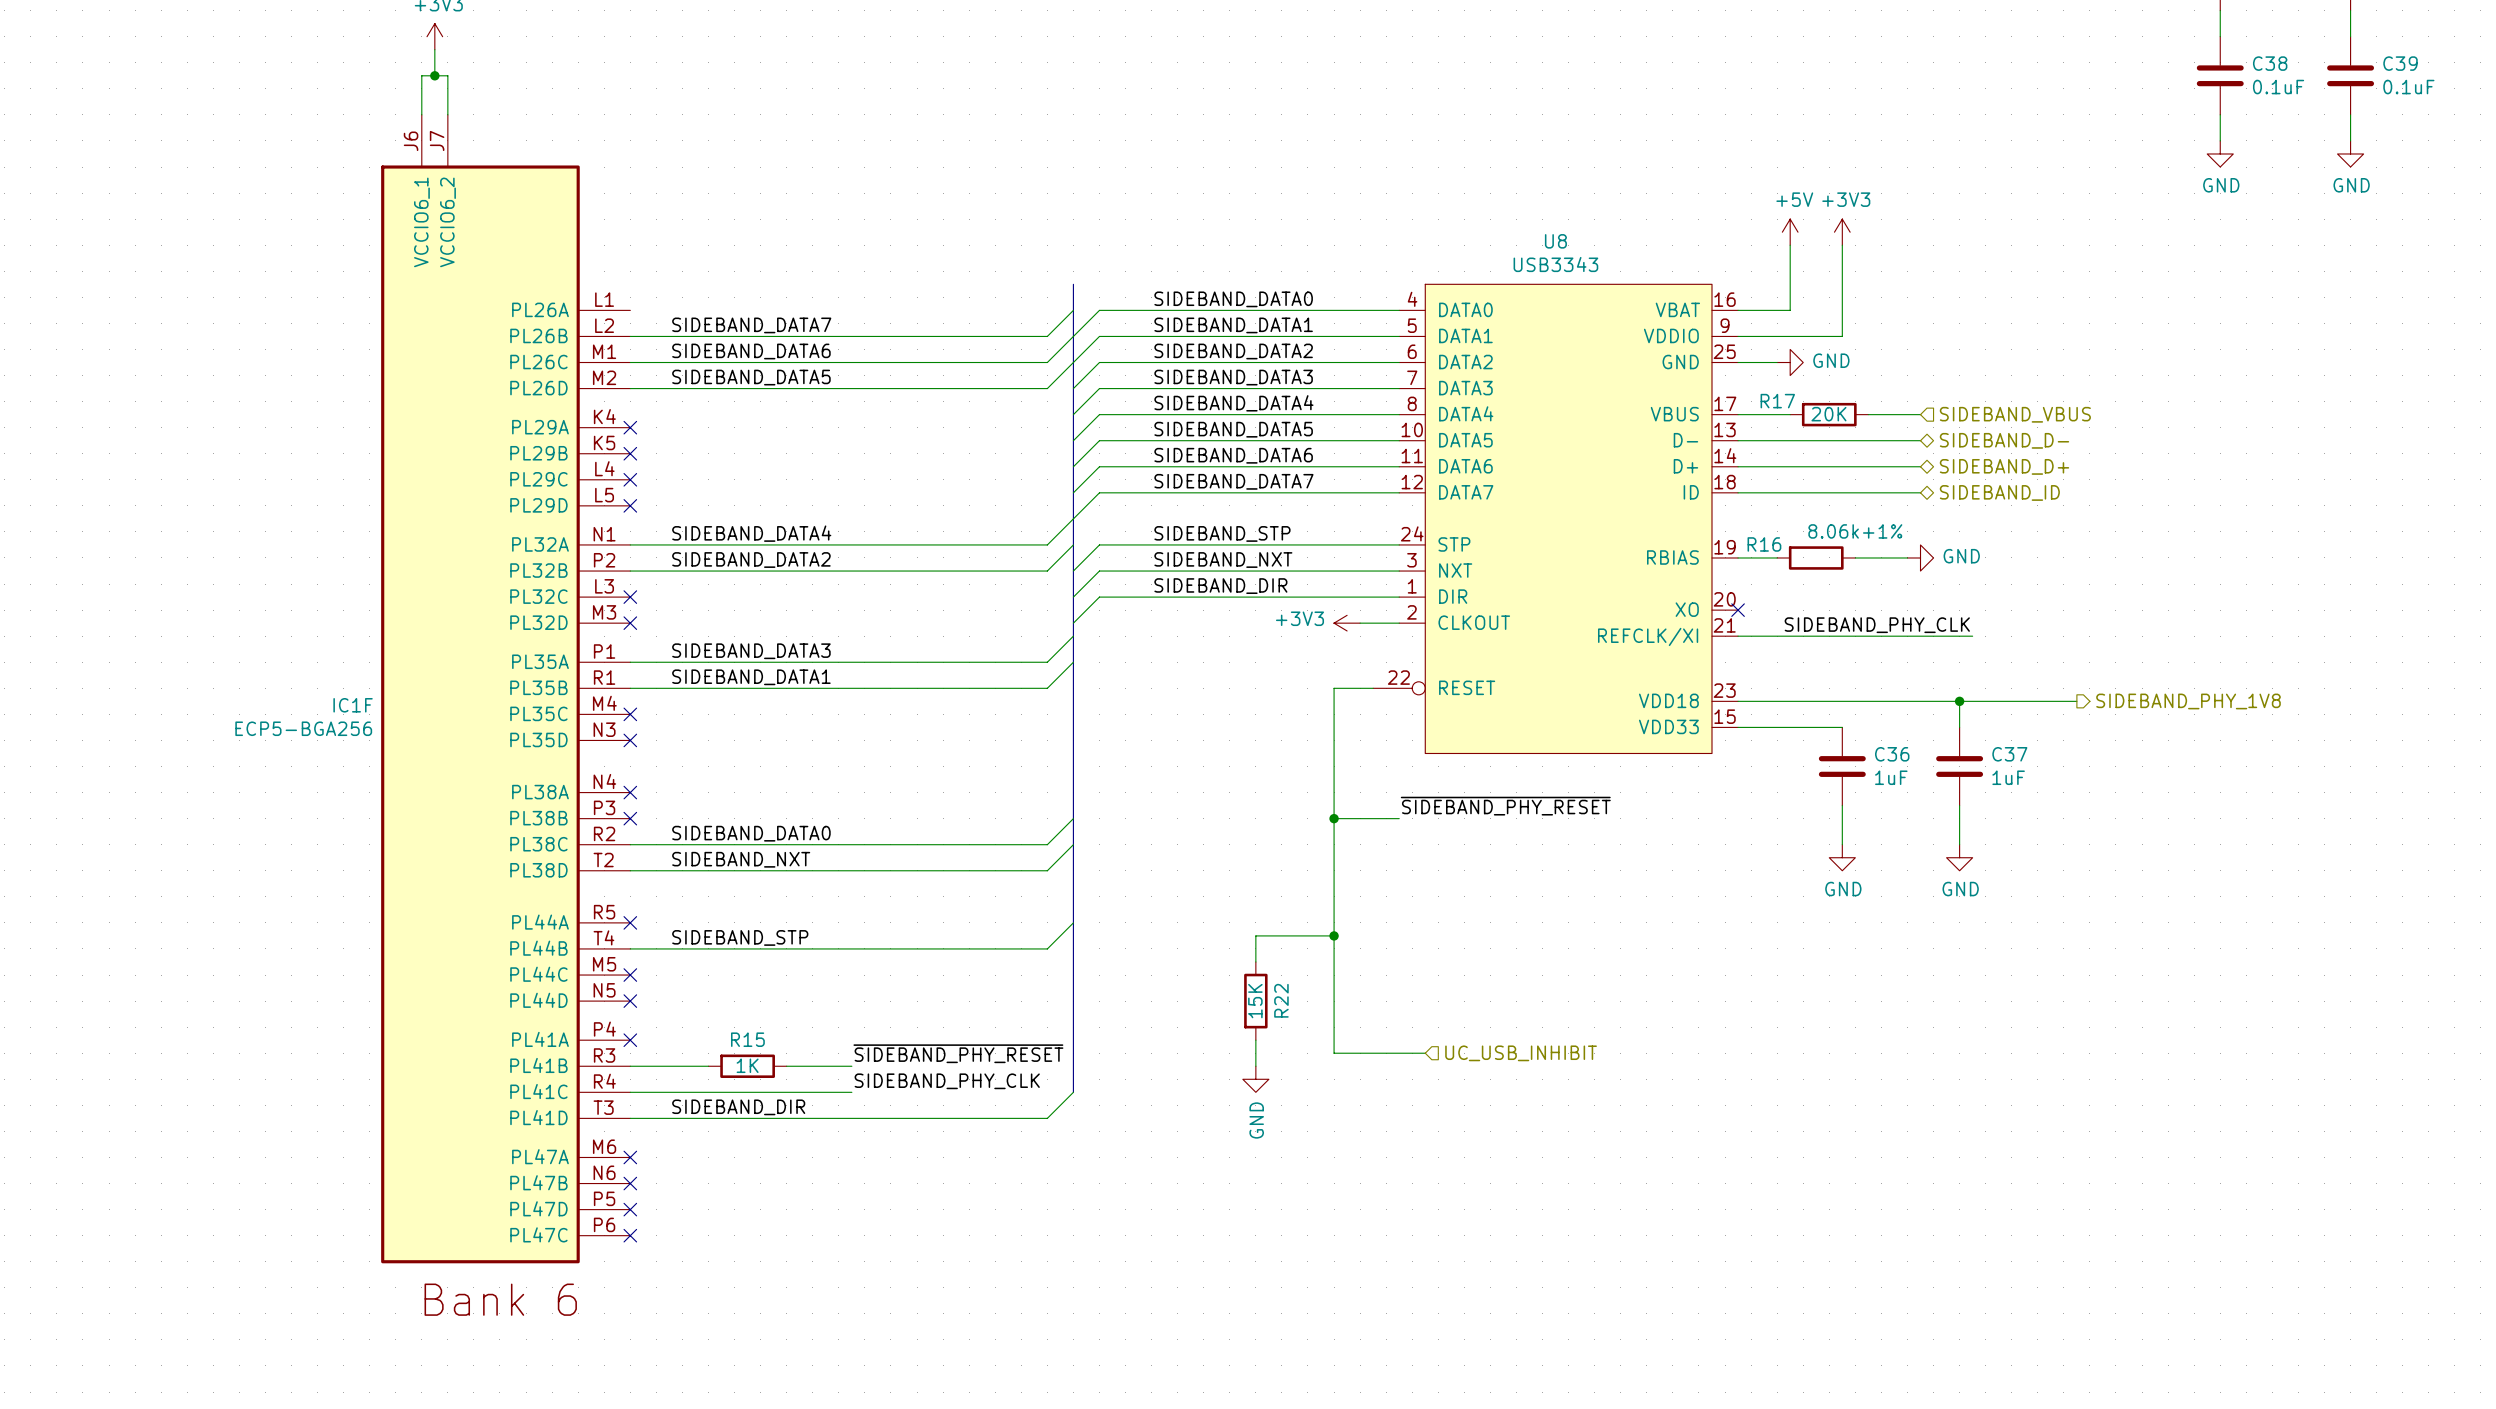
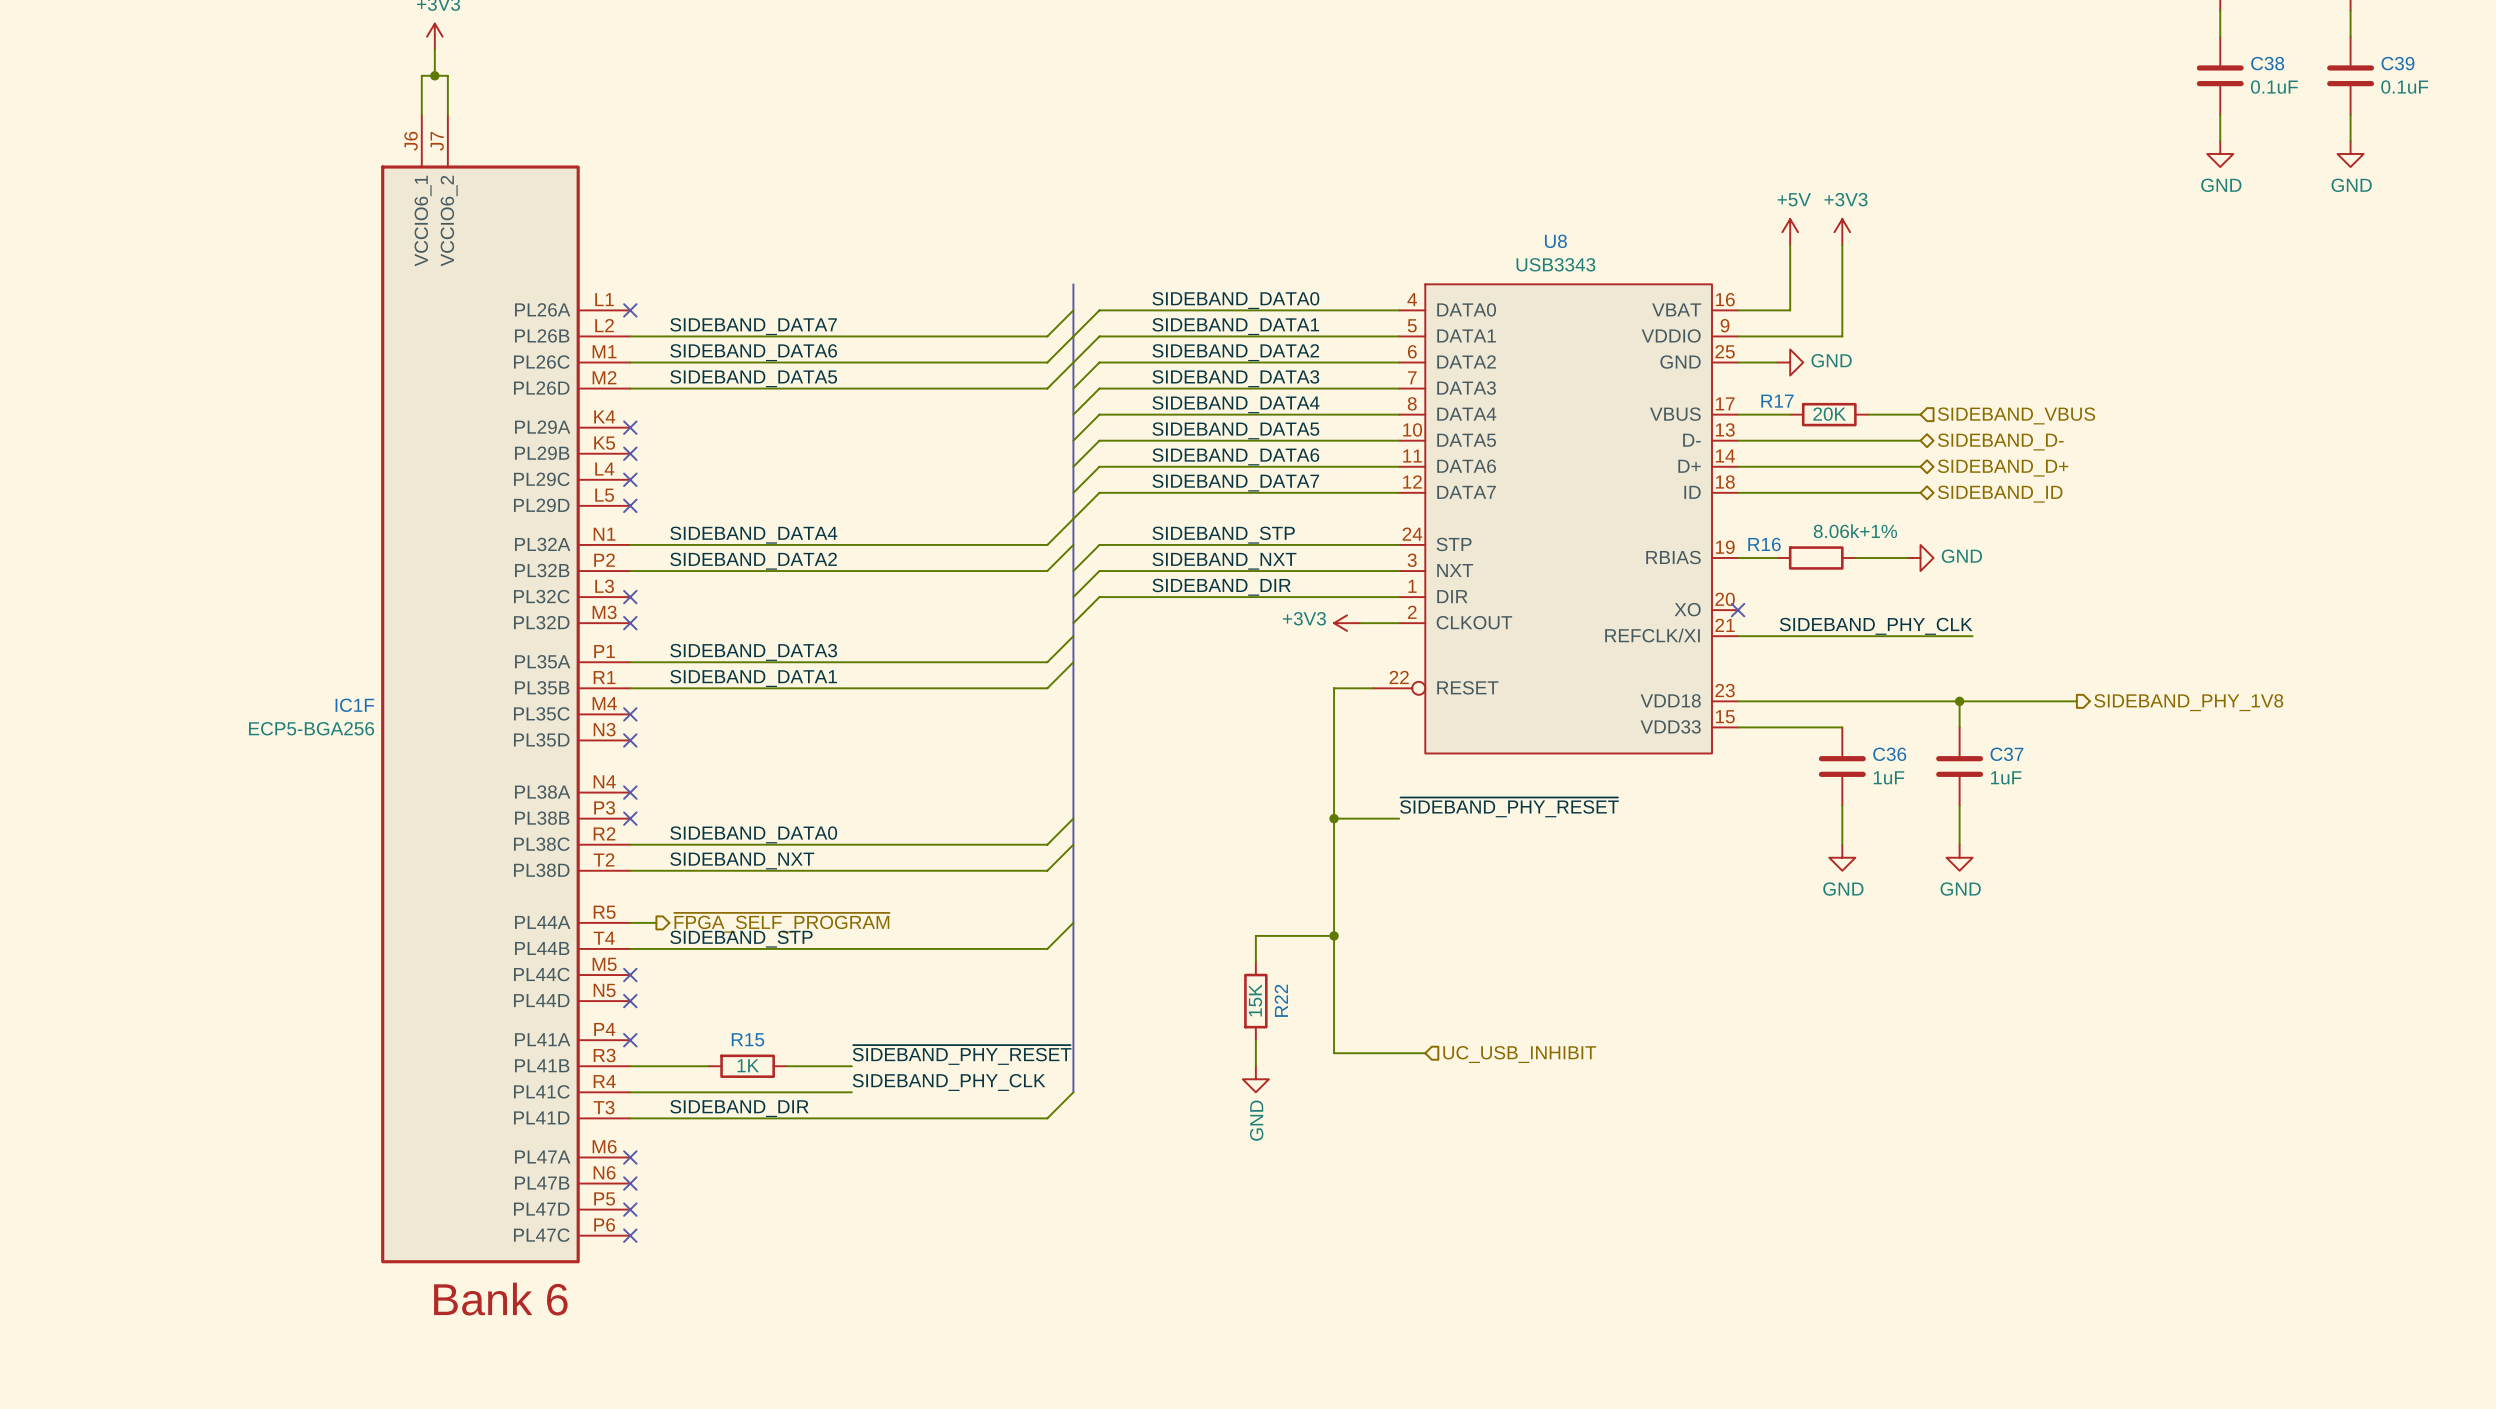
no-connect mark: none -> (630, 310)
hierarchical label: none -> ~{FPGA_SELF_PROGRAM} (781, 922)
wire: none -> (630, 922) (656, 922)
no-connect mark: (630, 922) -> none

